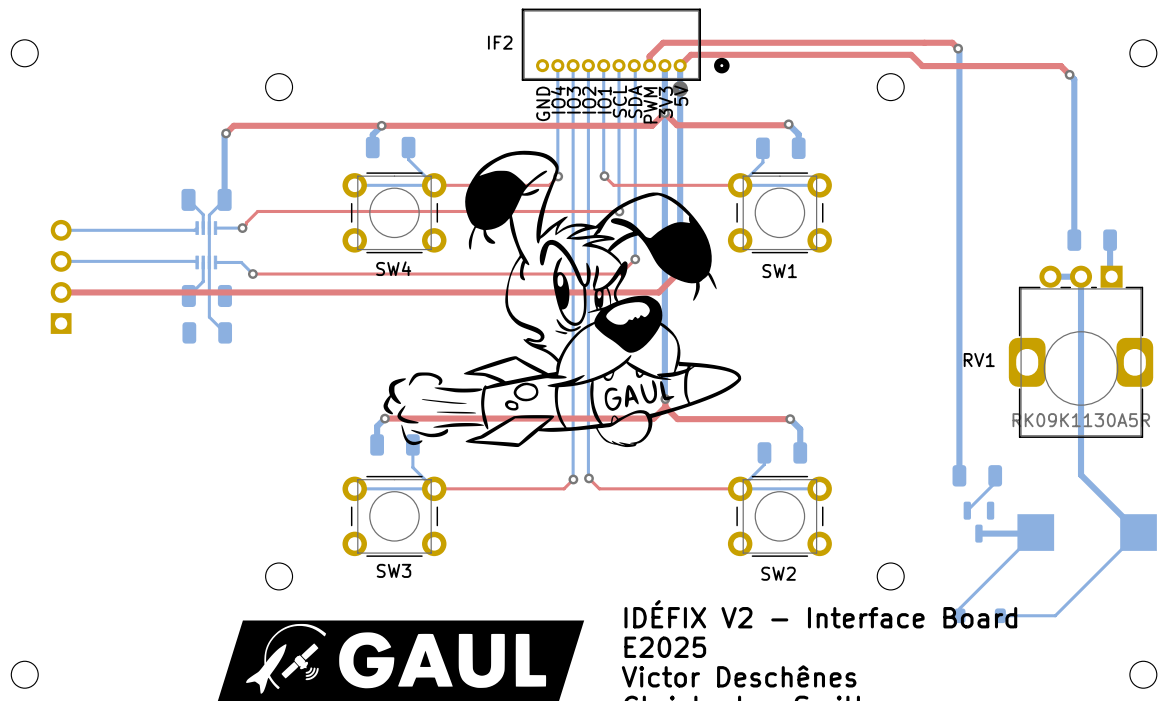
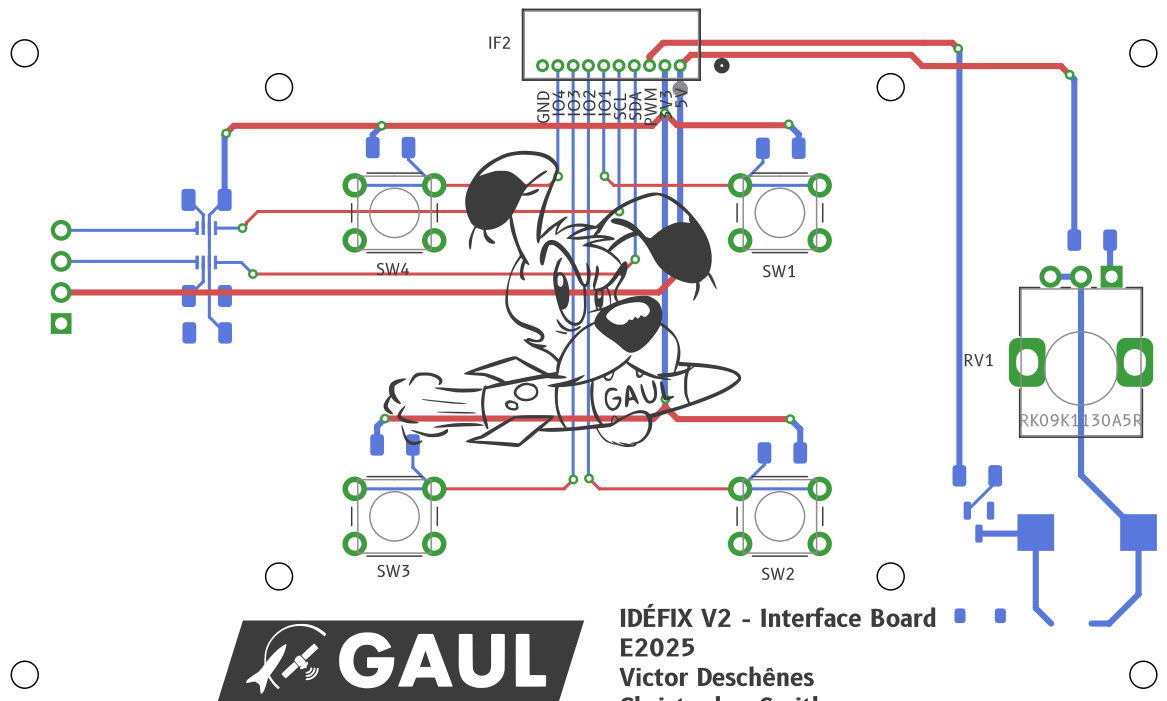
bottom track: (1035, 532) (960, 608) (960, 615) -> (1035, 532) (1035, 608) (1051, 623)
bottom track: (1138, 532) (1055, 615) (1000, 615) -> (1138, 532) (1138, 594) (1109, 623) (1091, 623)

